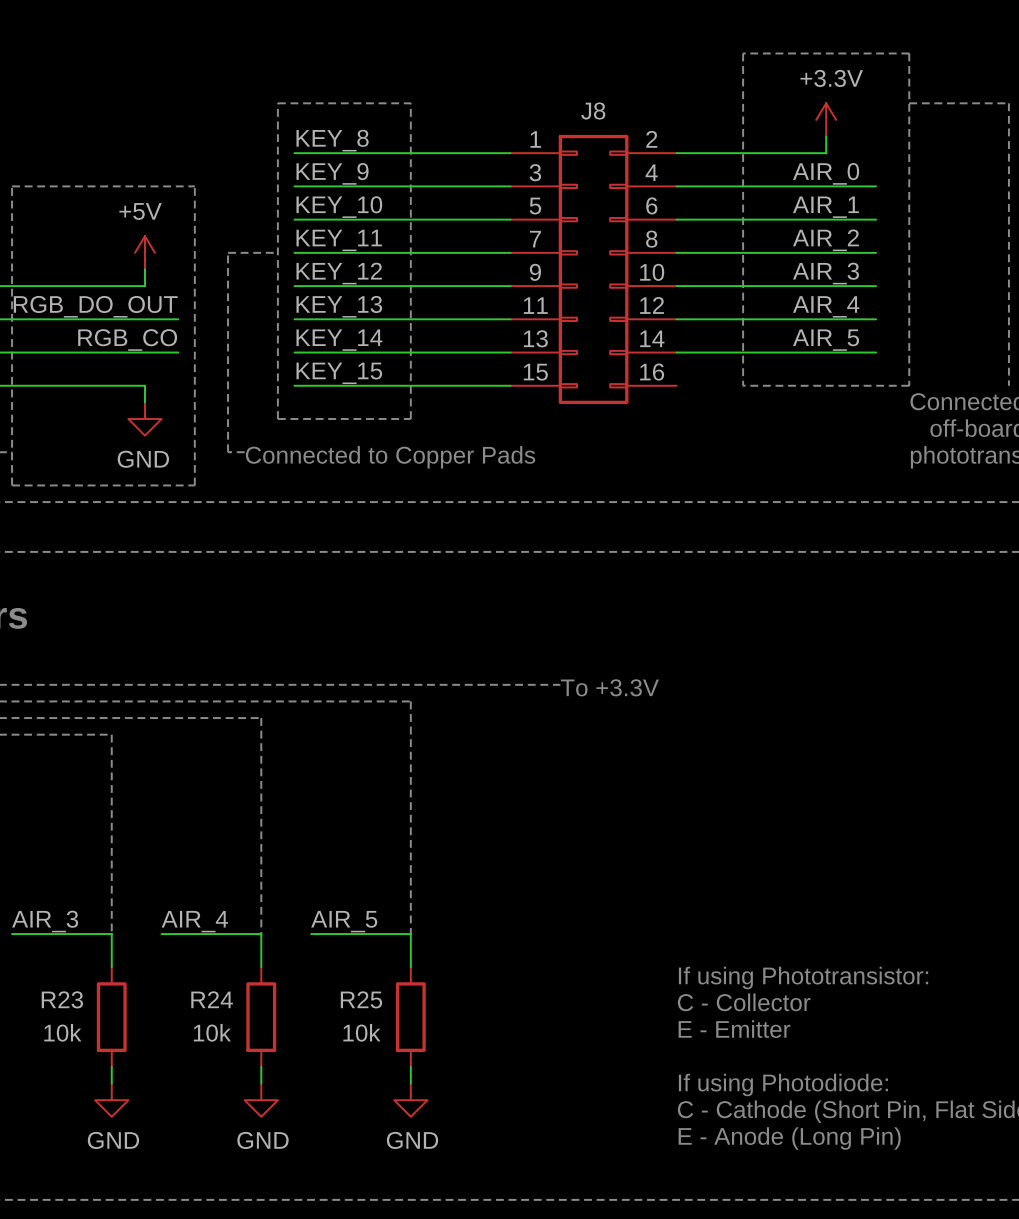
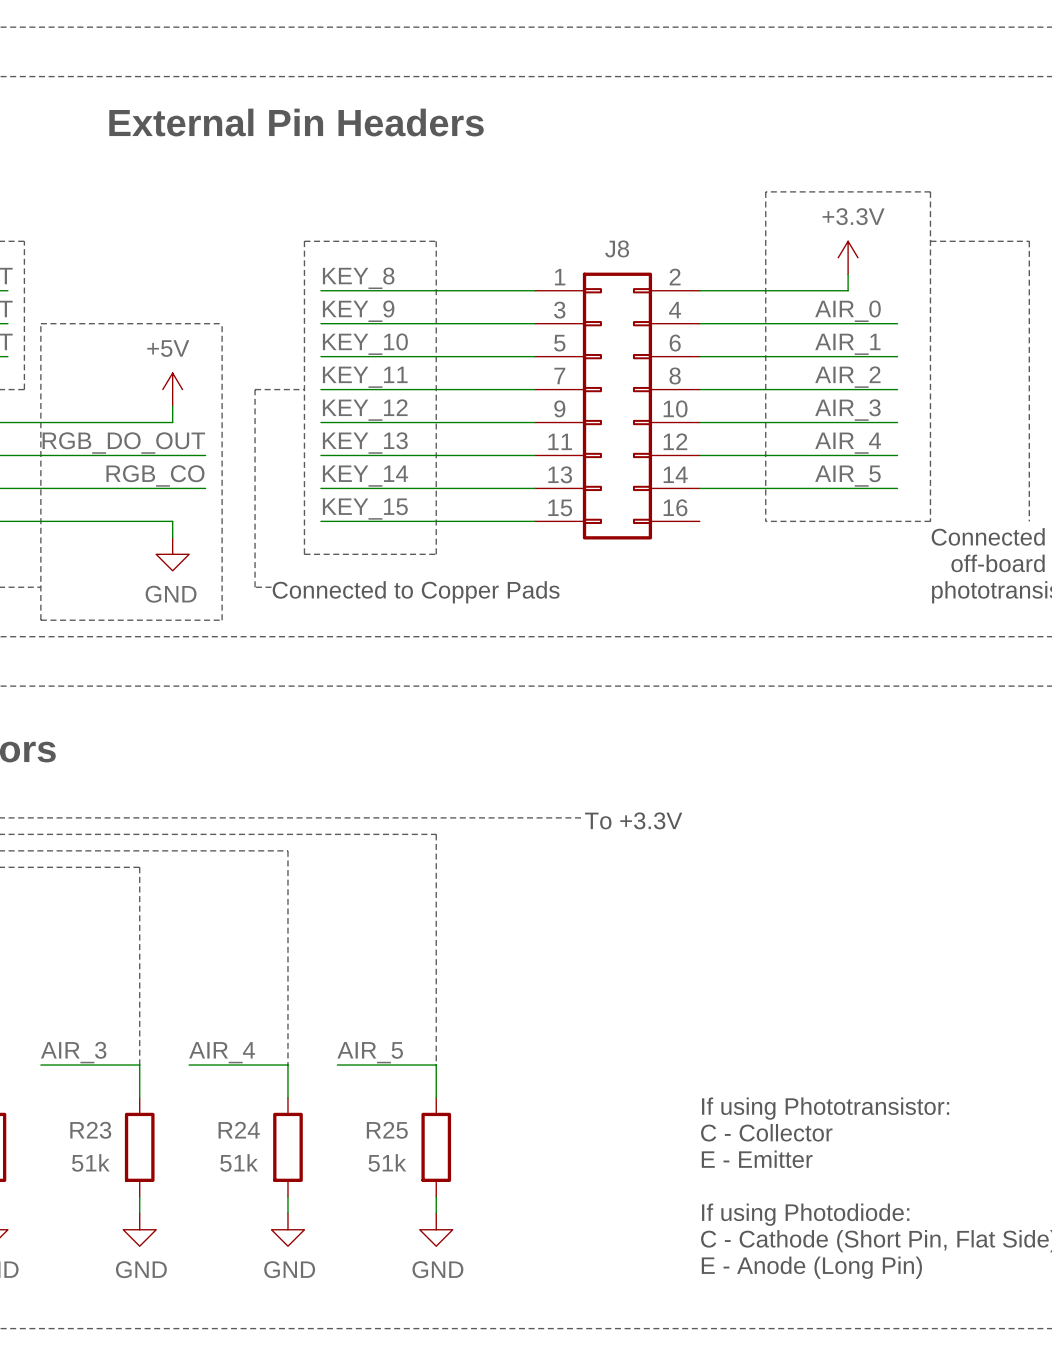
R23 value: 10k (62, 1032) -> 51k (90, 1162)
R24 value: 10k (212, 1032) -> 51k (239, 1162)
R25 value: 10k (361, 1032) -> 51k (387, 1162)

